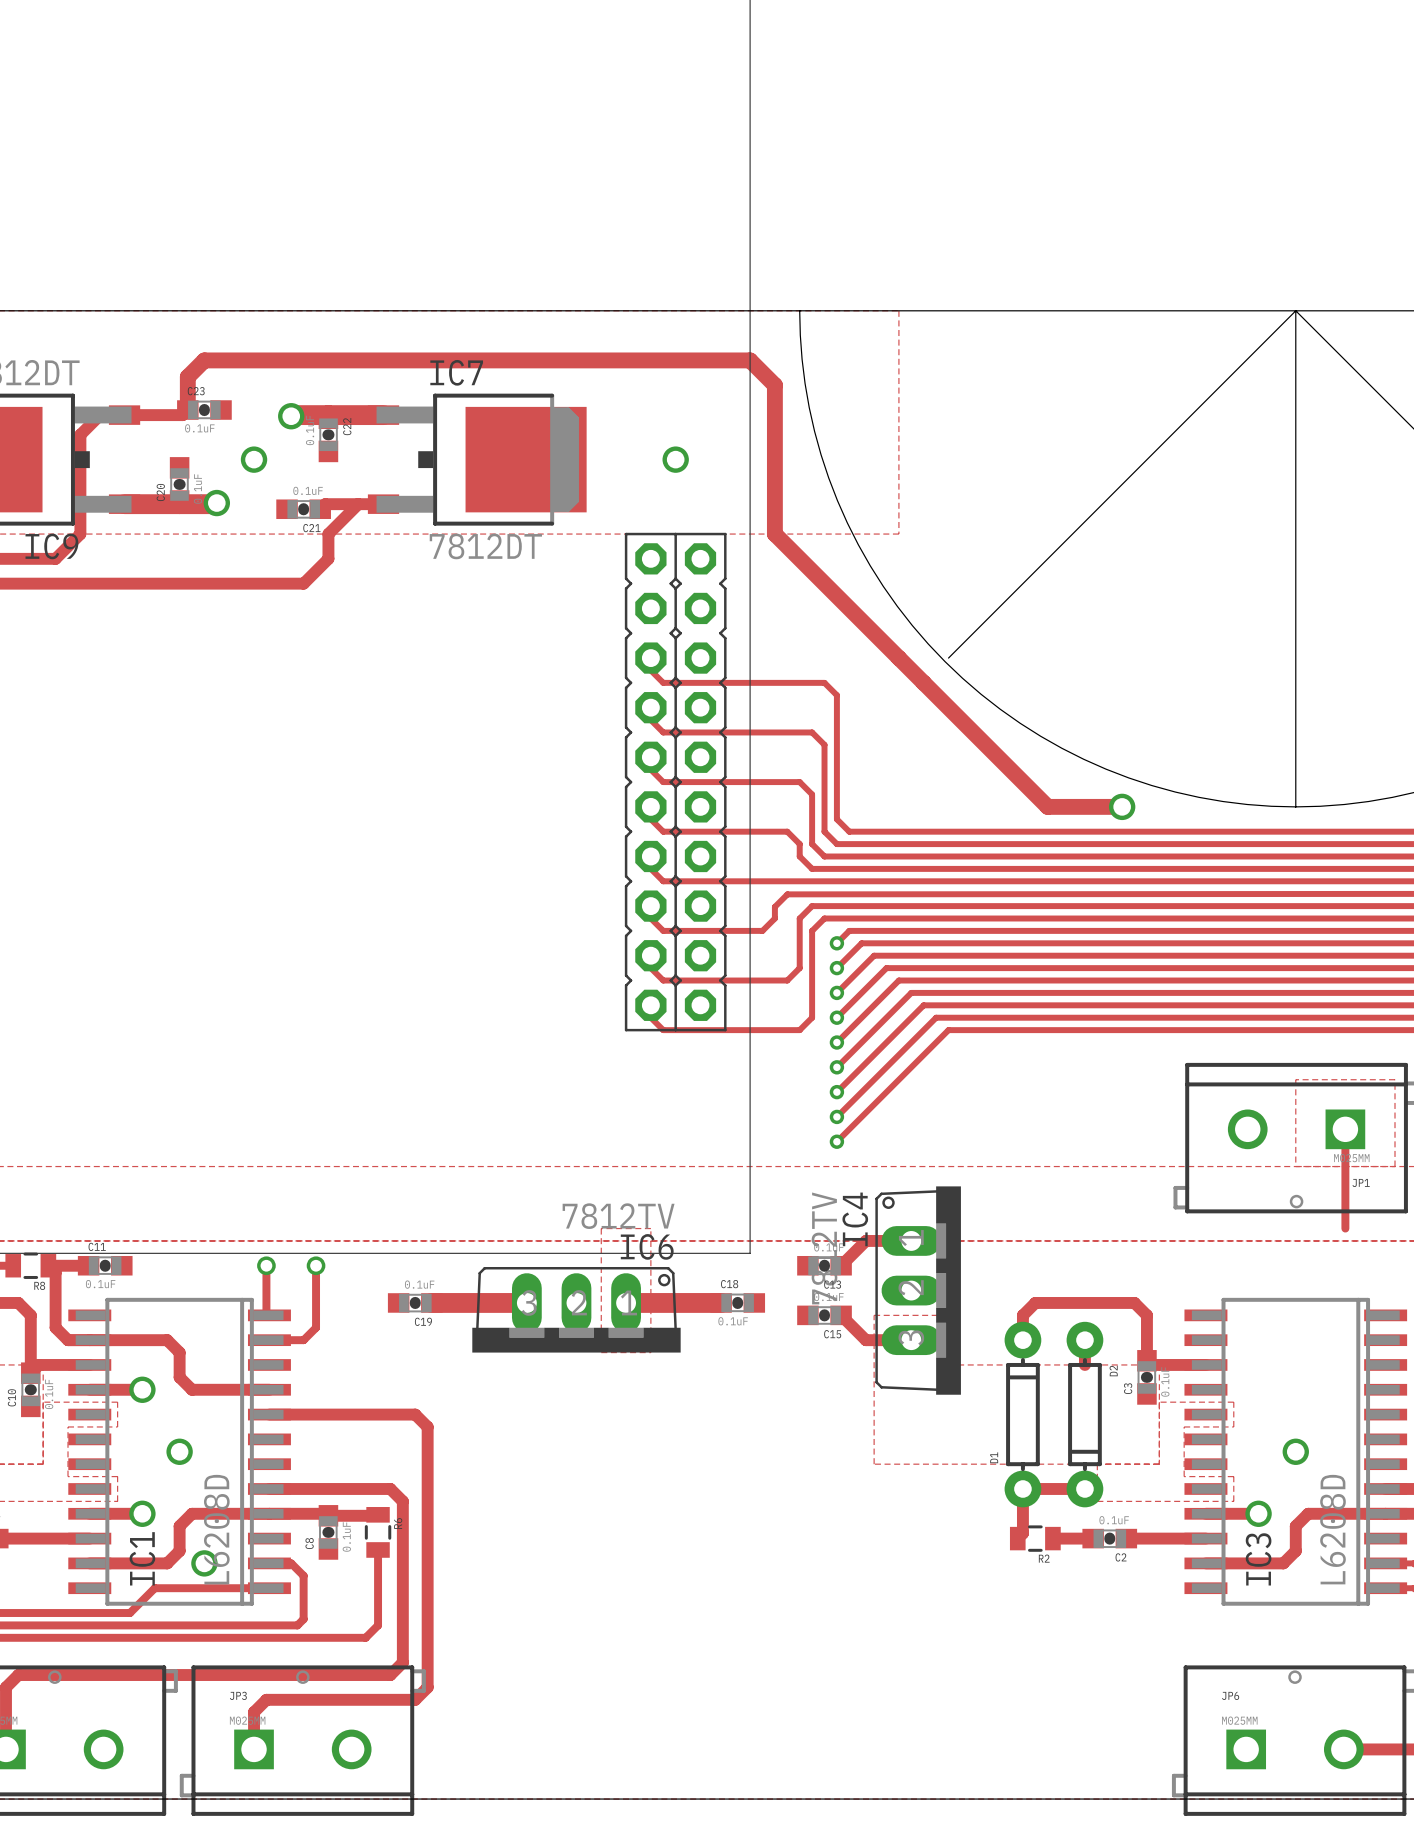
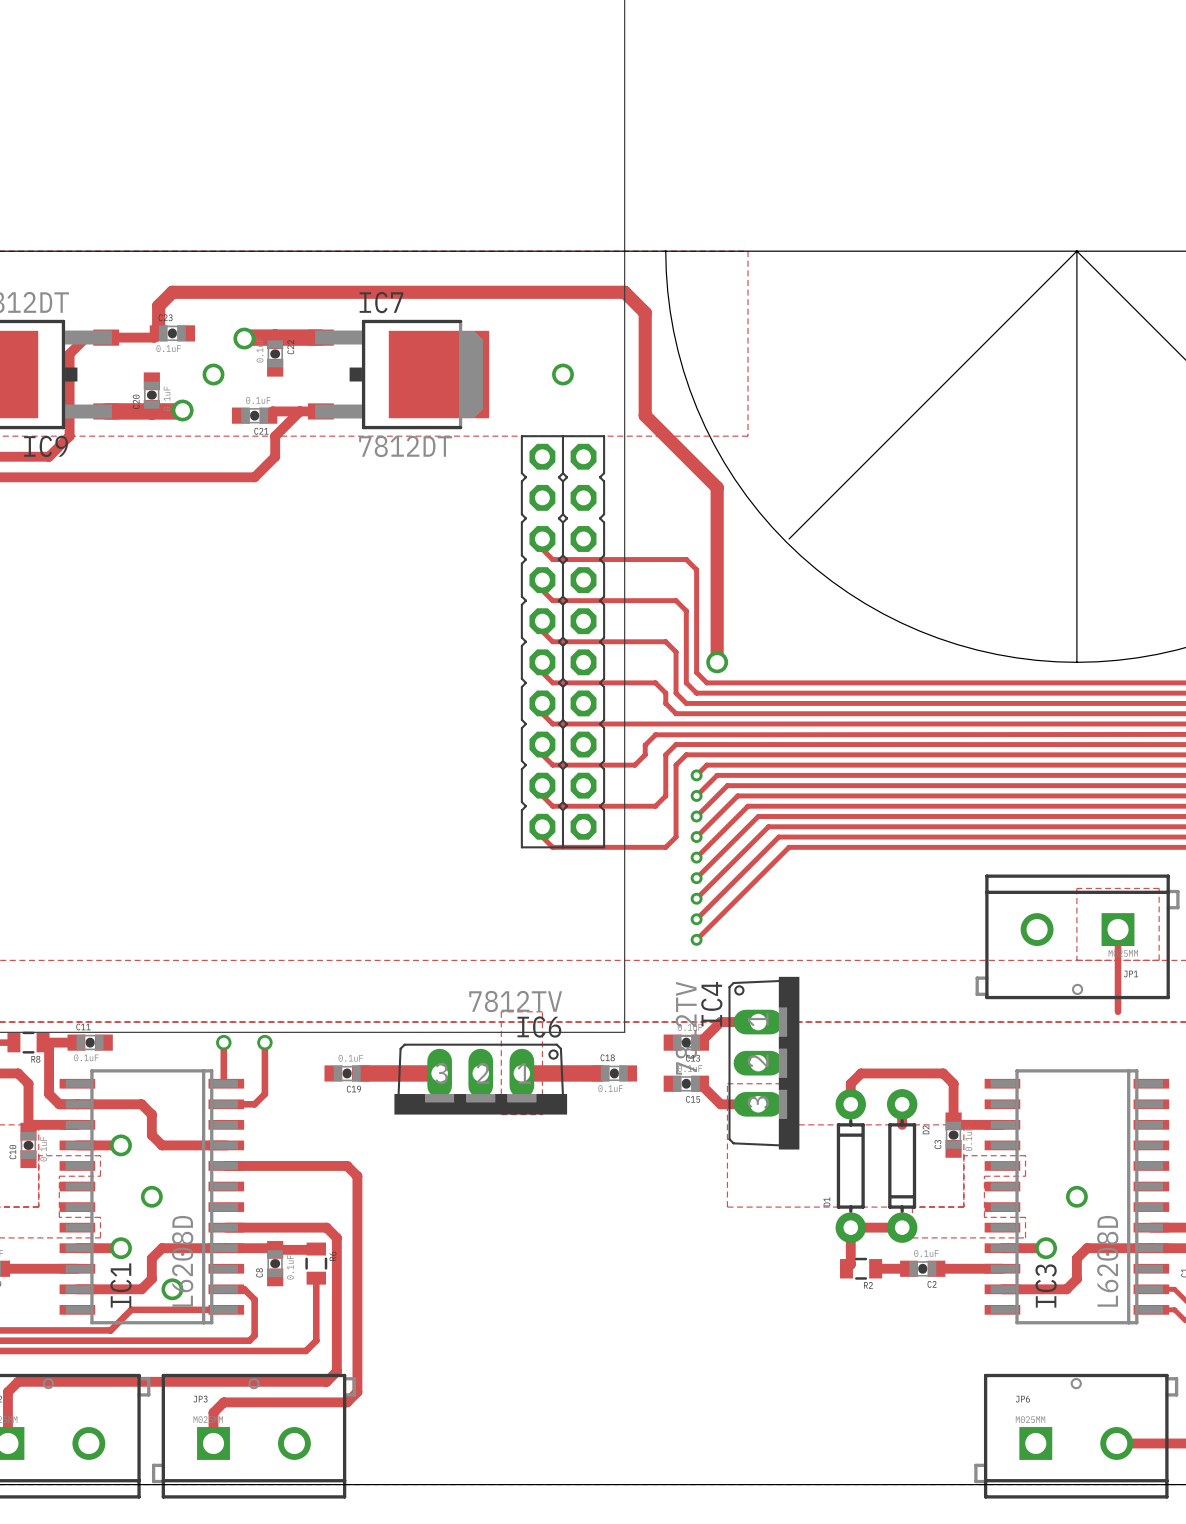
track: (774, 509) (774, 534) (1047, 806) (1122, 806) -> (645, 415) (717, 487) (717, 662)
via: none -> (717, 662)
via: (1122, 806) -> none

